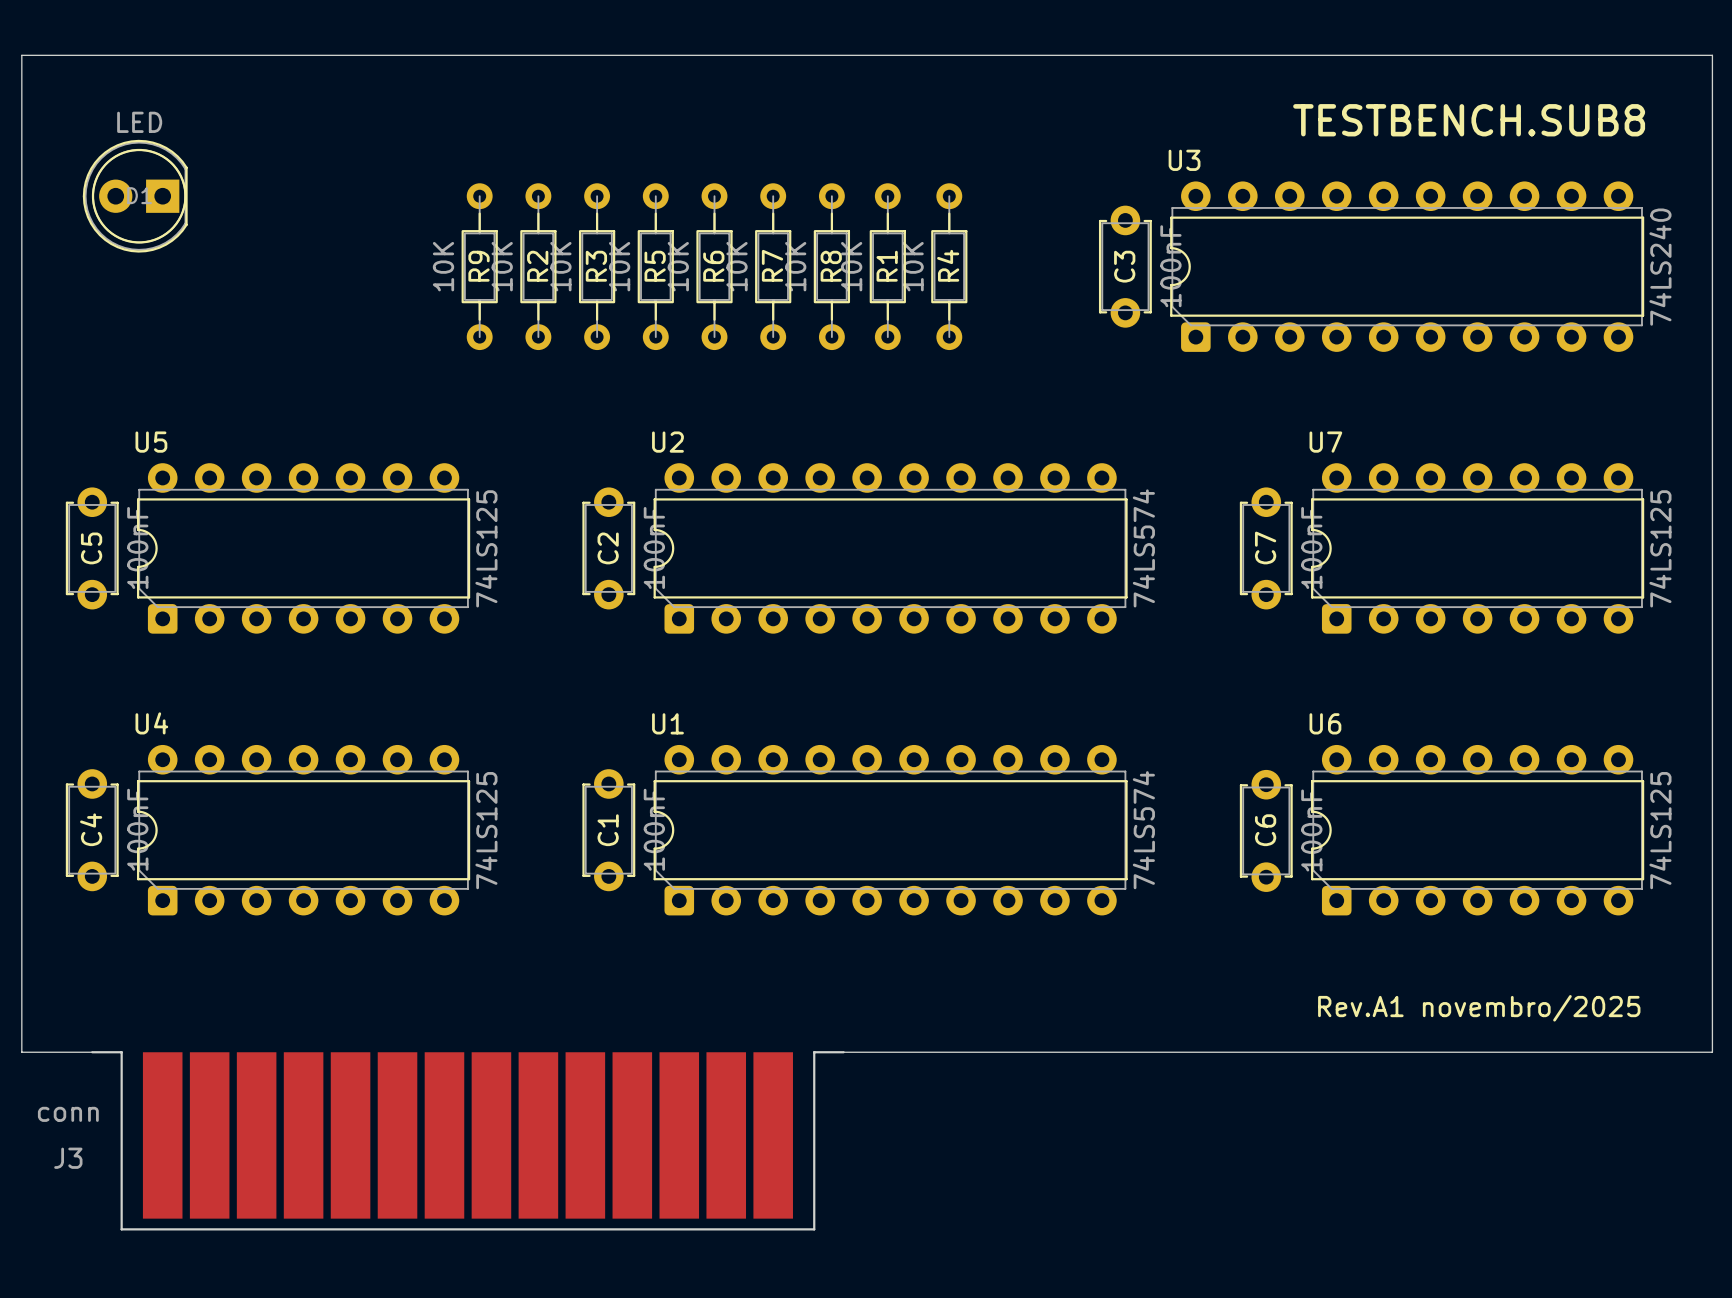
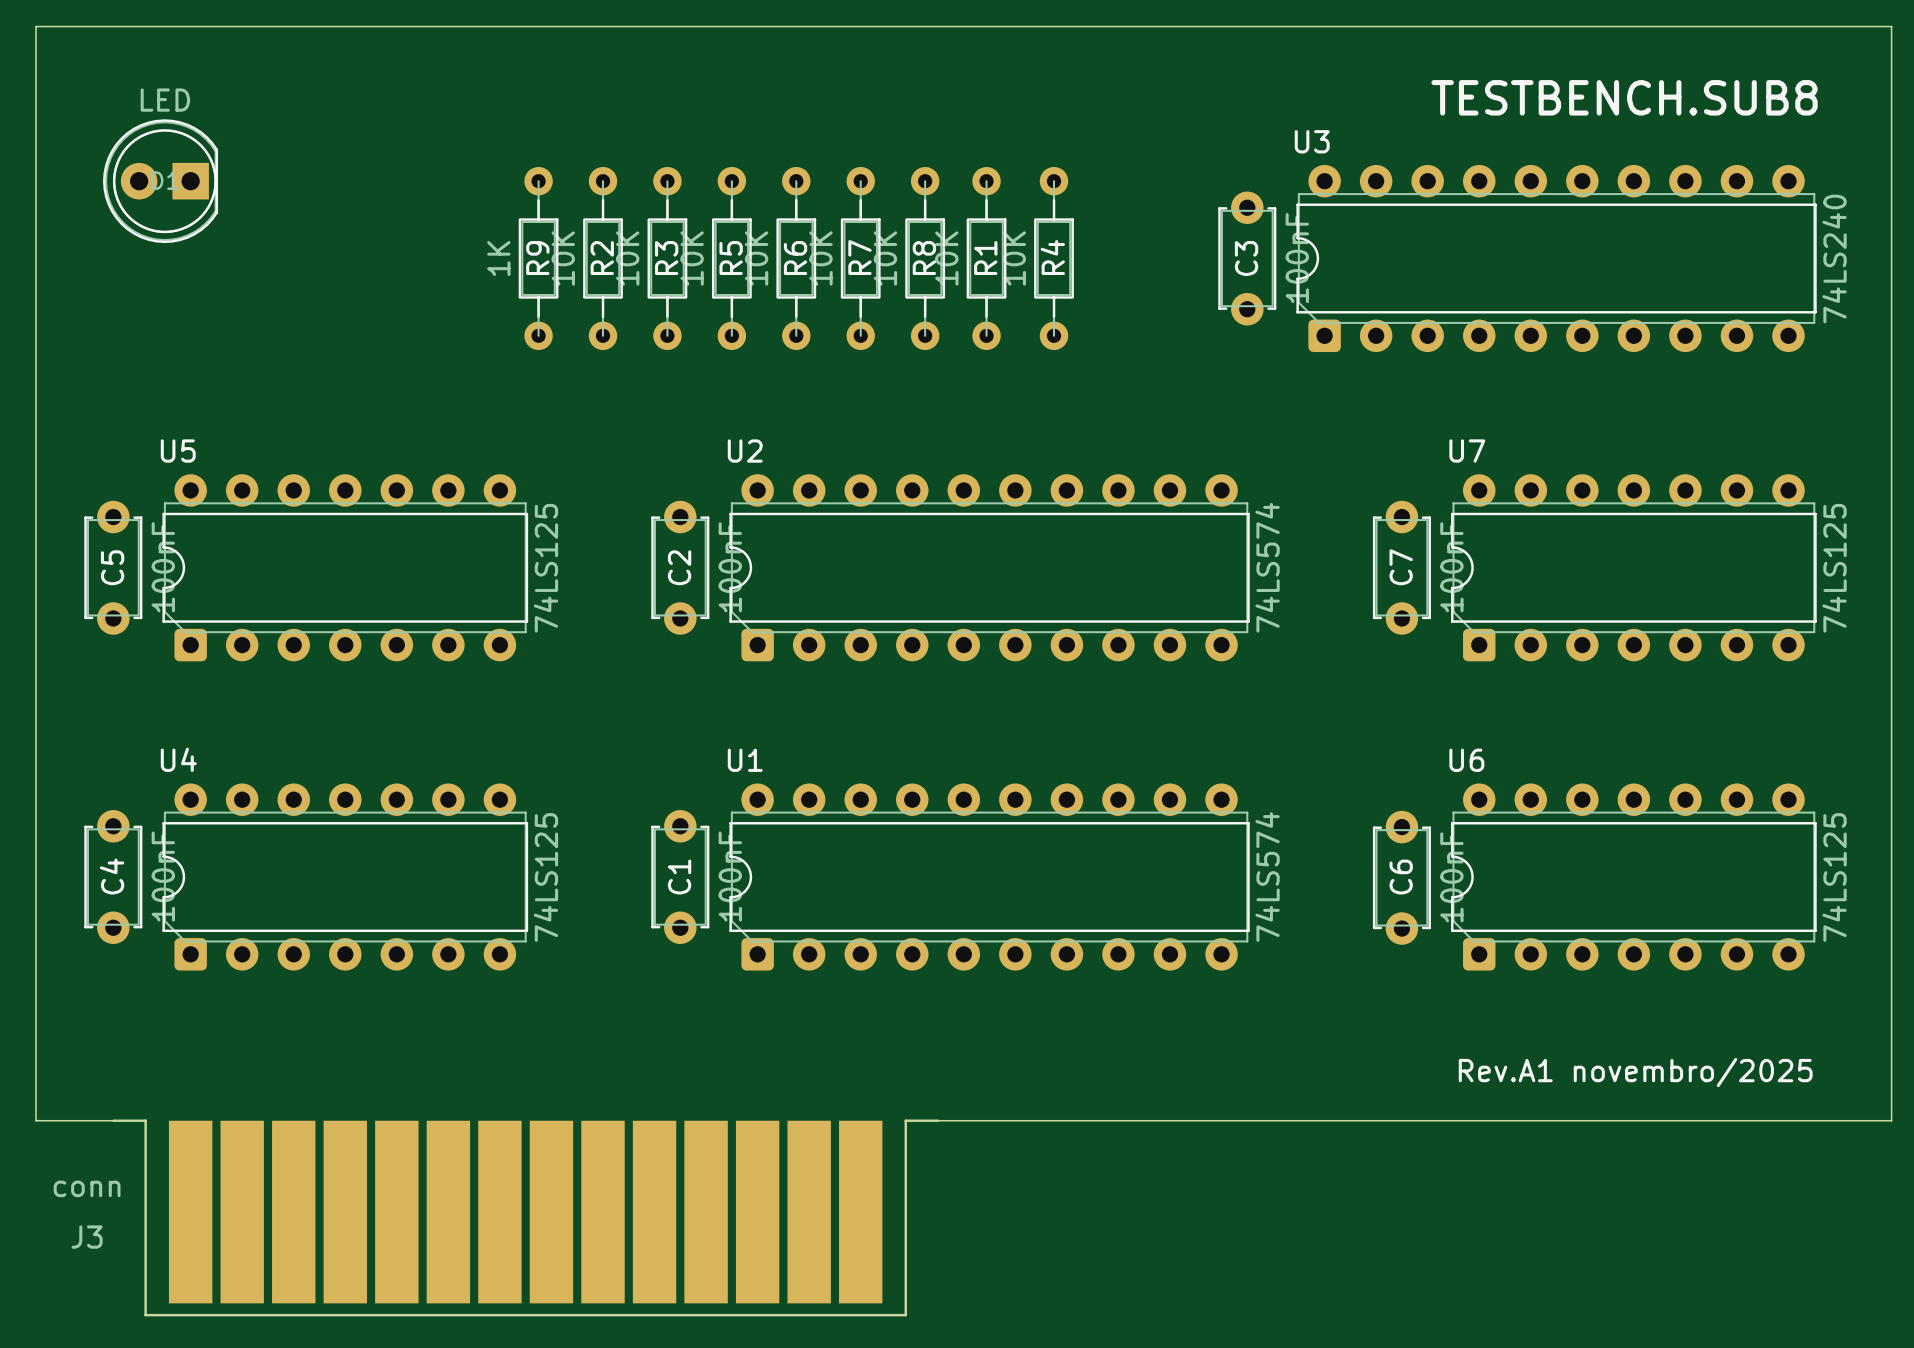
R9 value: 10K (443, 266) -> 1K (498, 258)

